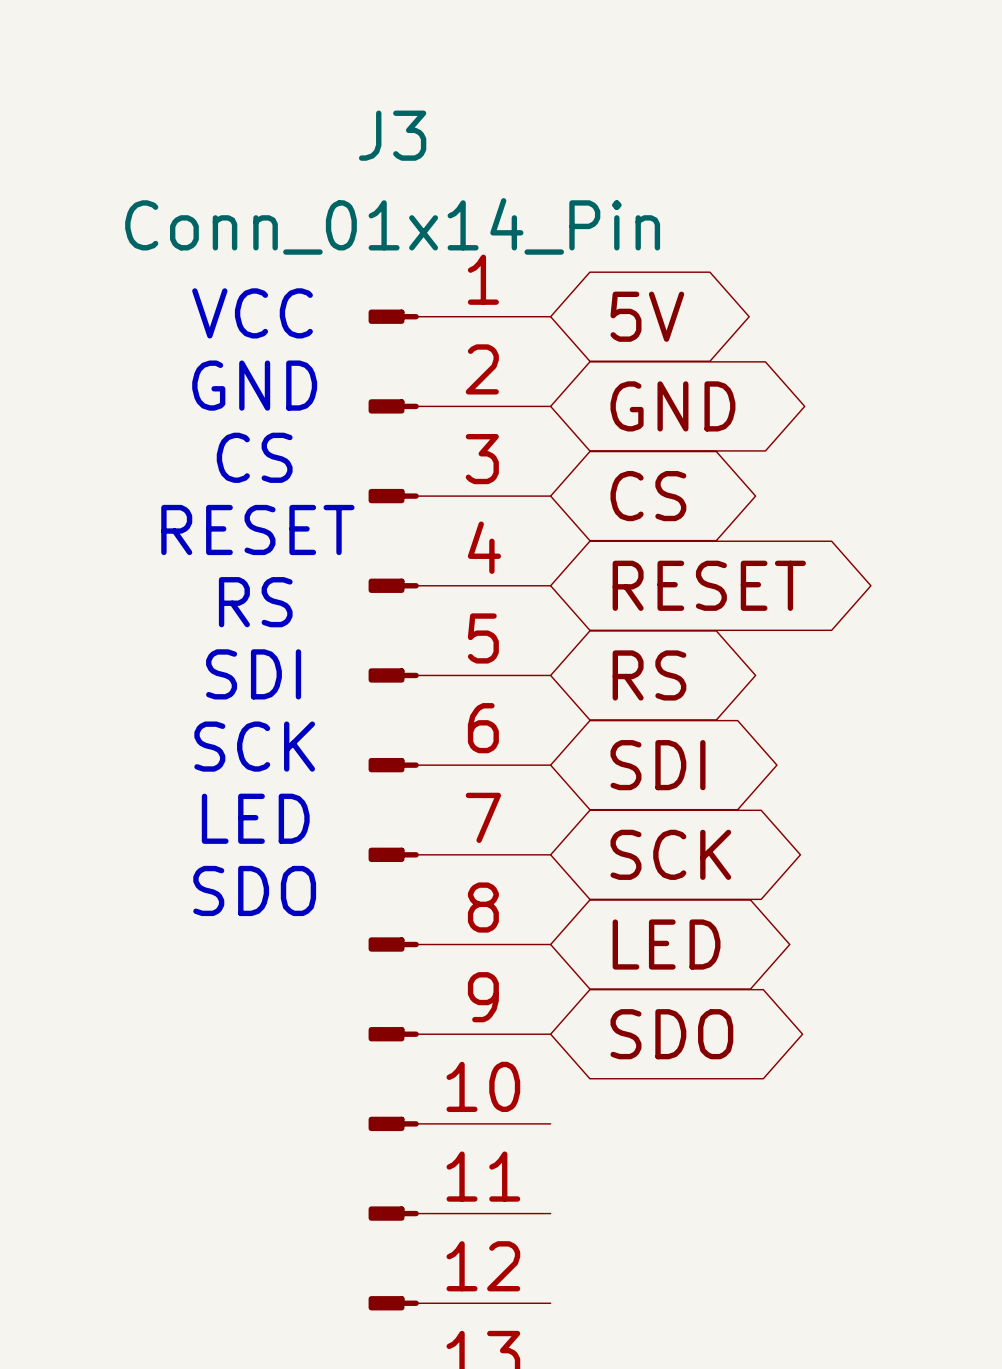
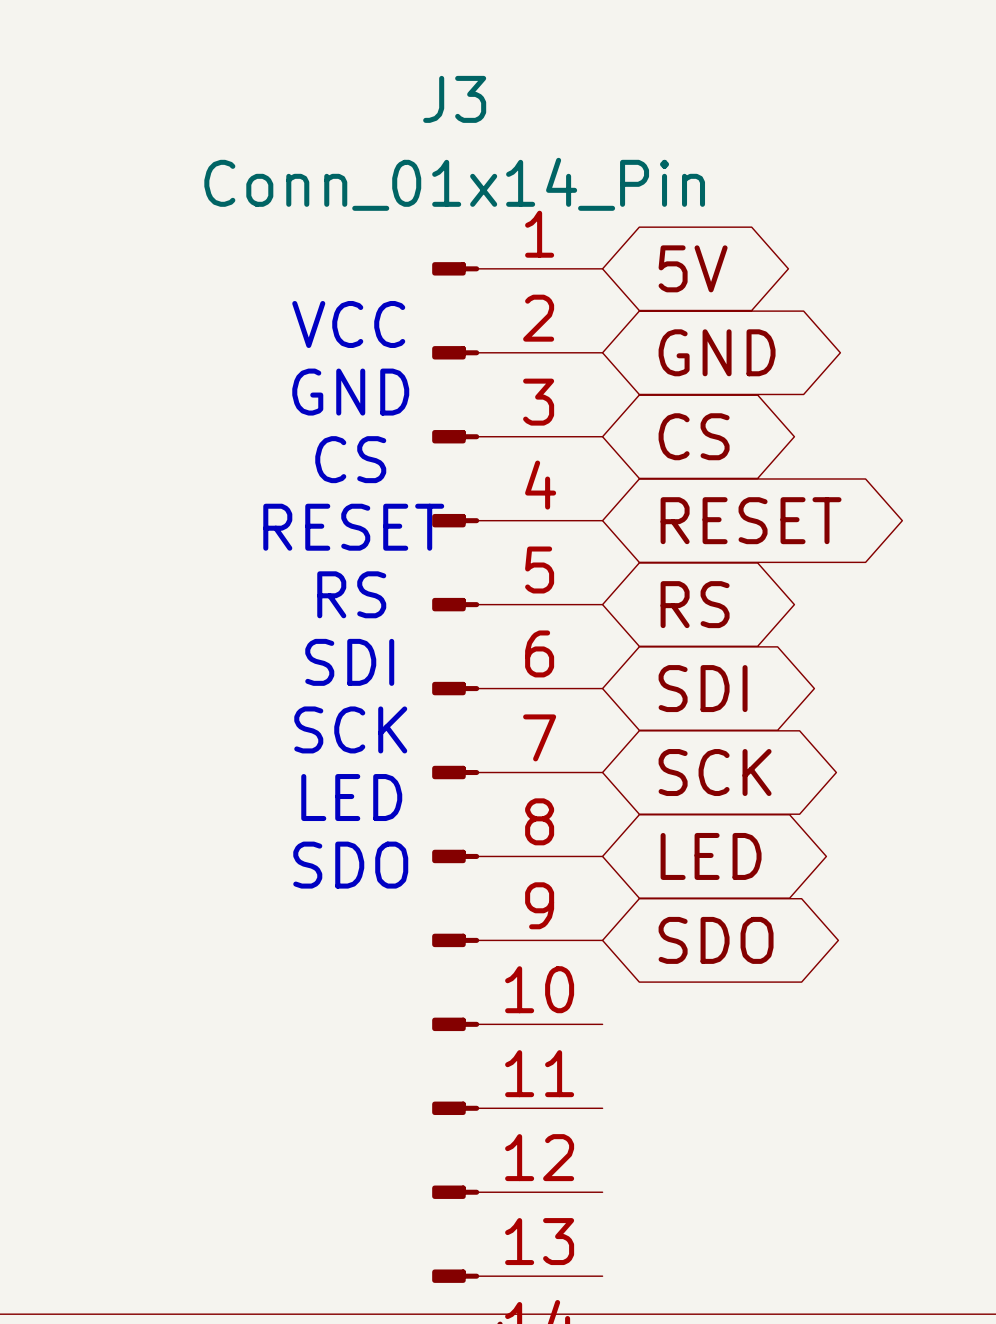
text position: VCC (252, 313) -> VCC (348, 324)
text position: GND (254, 385) -> GND (350, 392)
text position: CS (254, 457) -> CS (350, 459)
text position: RESET (257, 529) -> RESET (353, 527)
text position: RS (255, 602) -> RS (351, 594)
text position: SDI (253, 674) -> SDI (349, 662)
text position: SCK (254, 746) -> SCK (350, 729)
text position: LED (255, 818) -> LED (351, 797)
text position: SDO (254, 890) -> SDO (350, 865)

